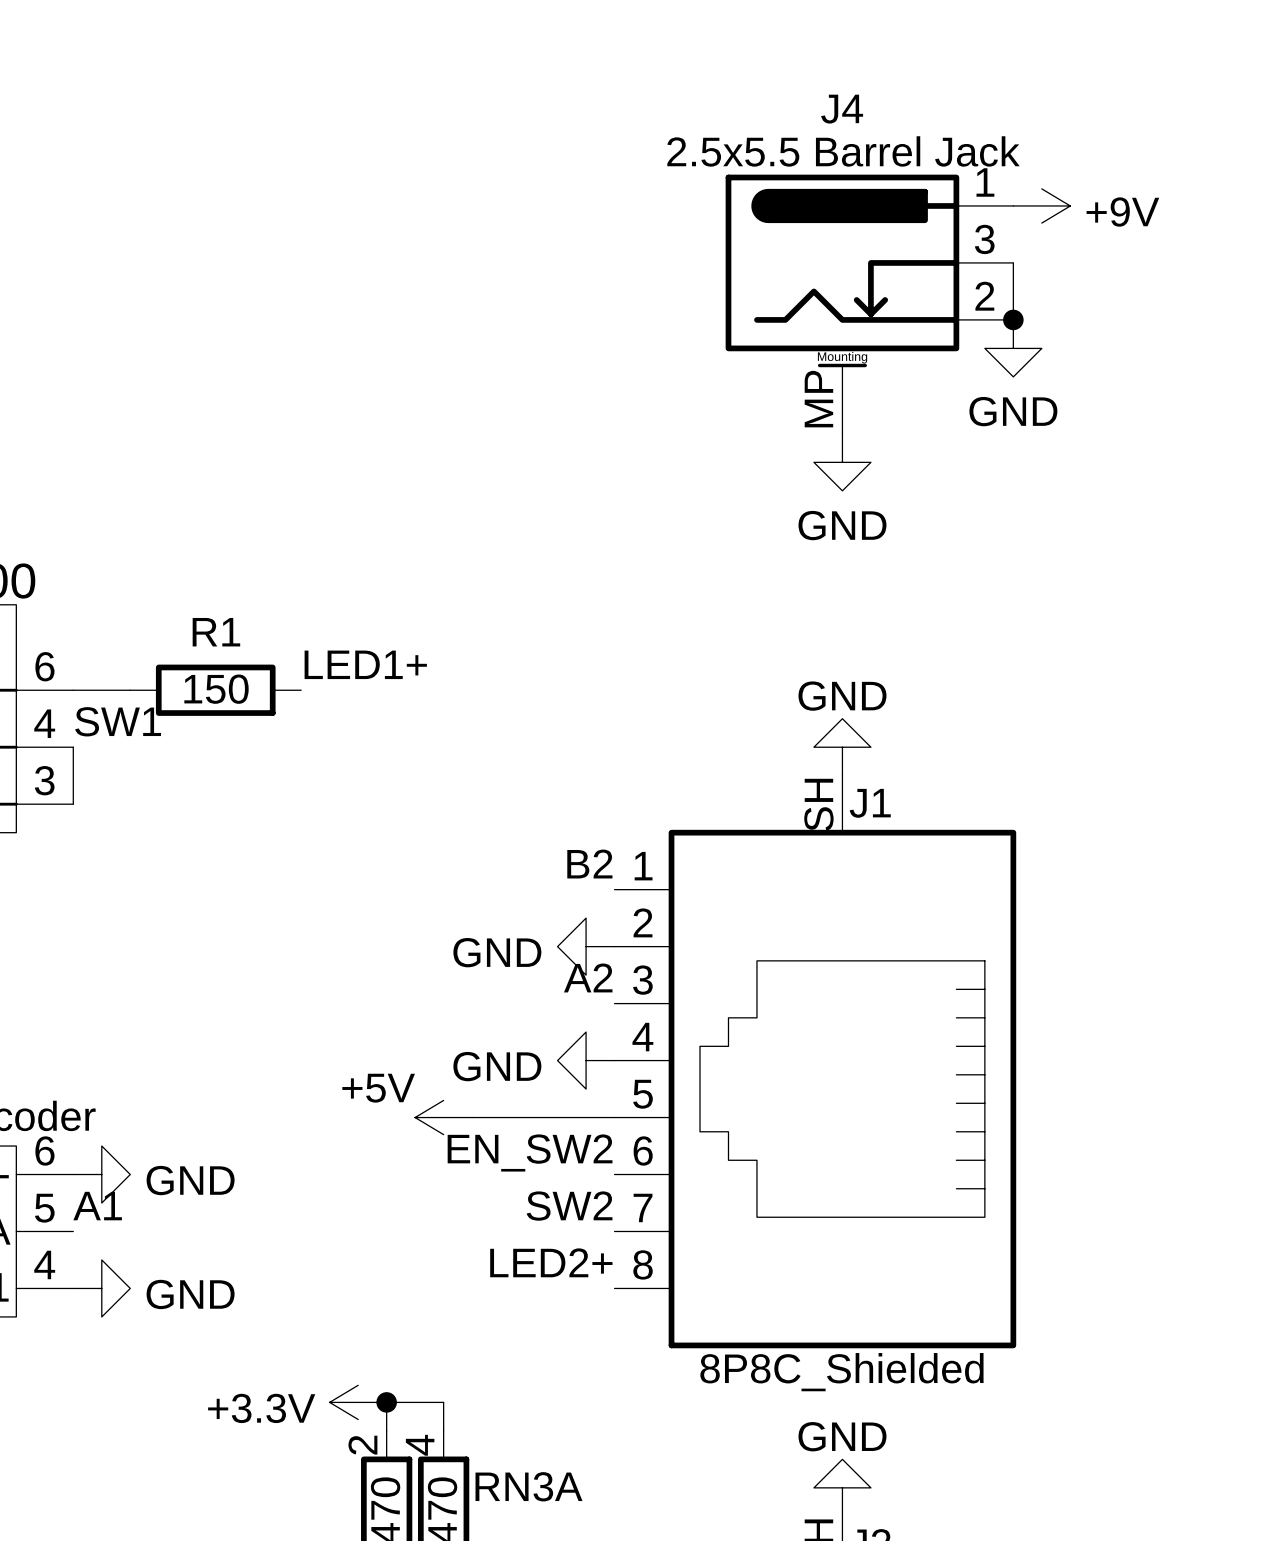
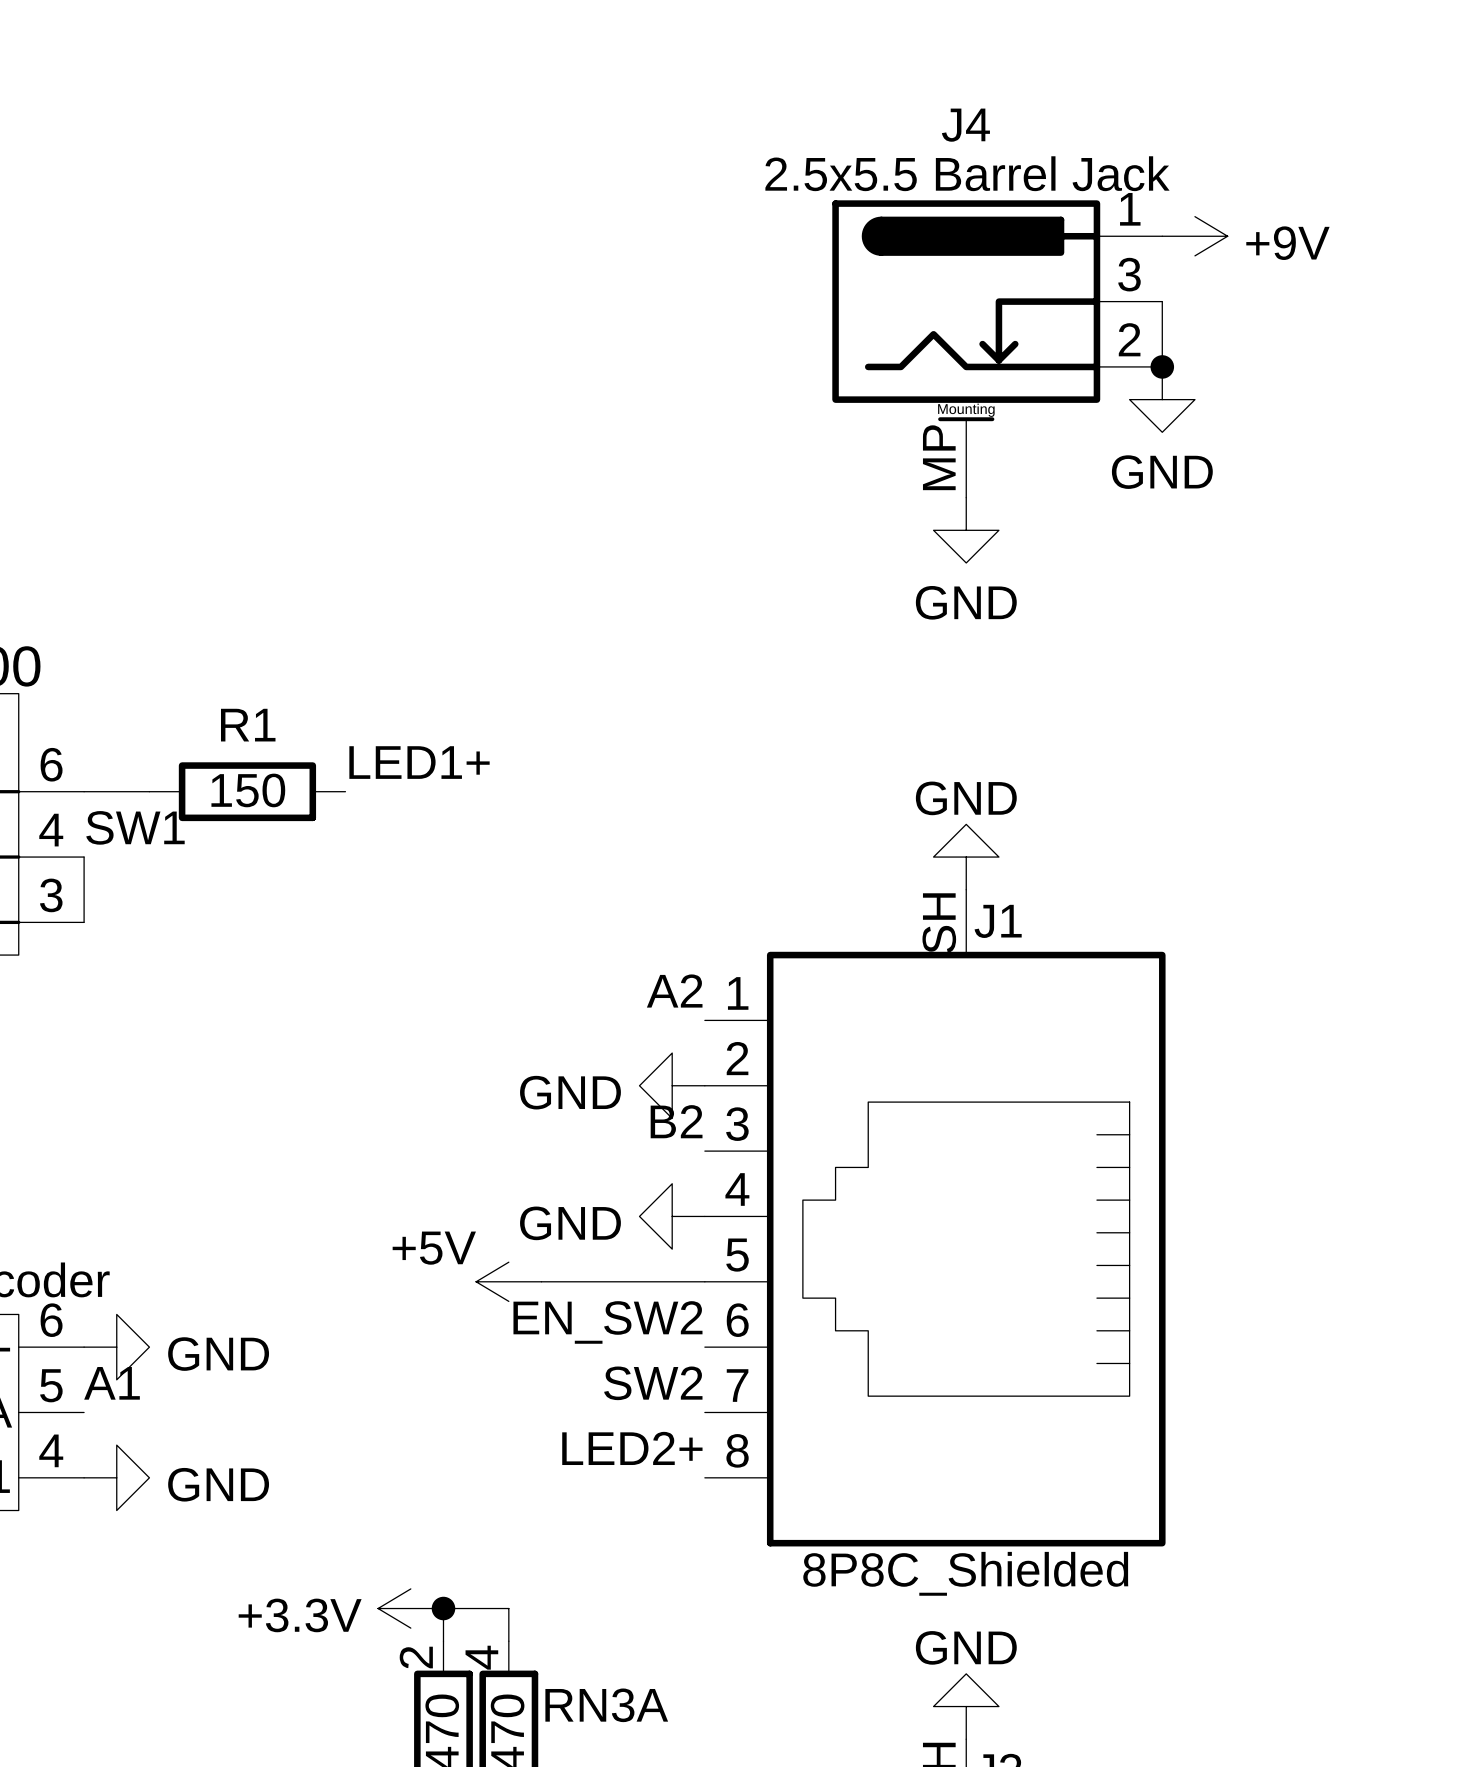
label: B2 (589, 864) -> A2 (674, 991)
label: A2 (588, 977) -> B2 (676, 1121)

